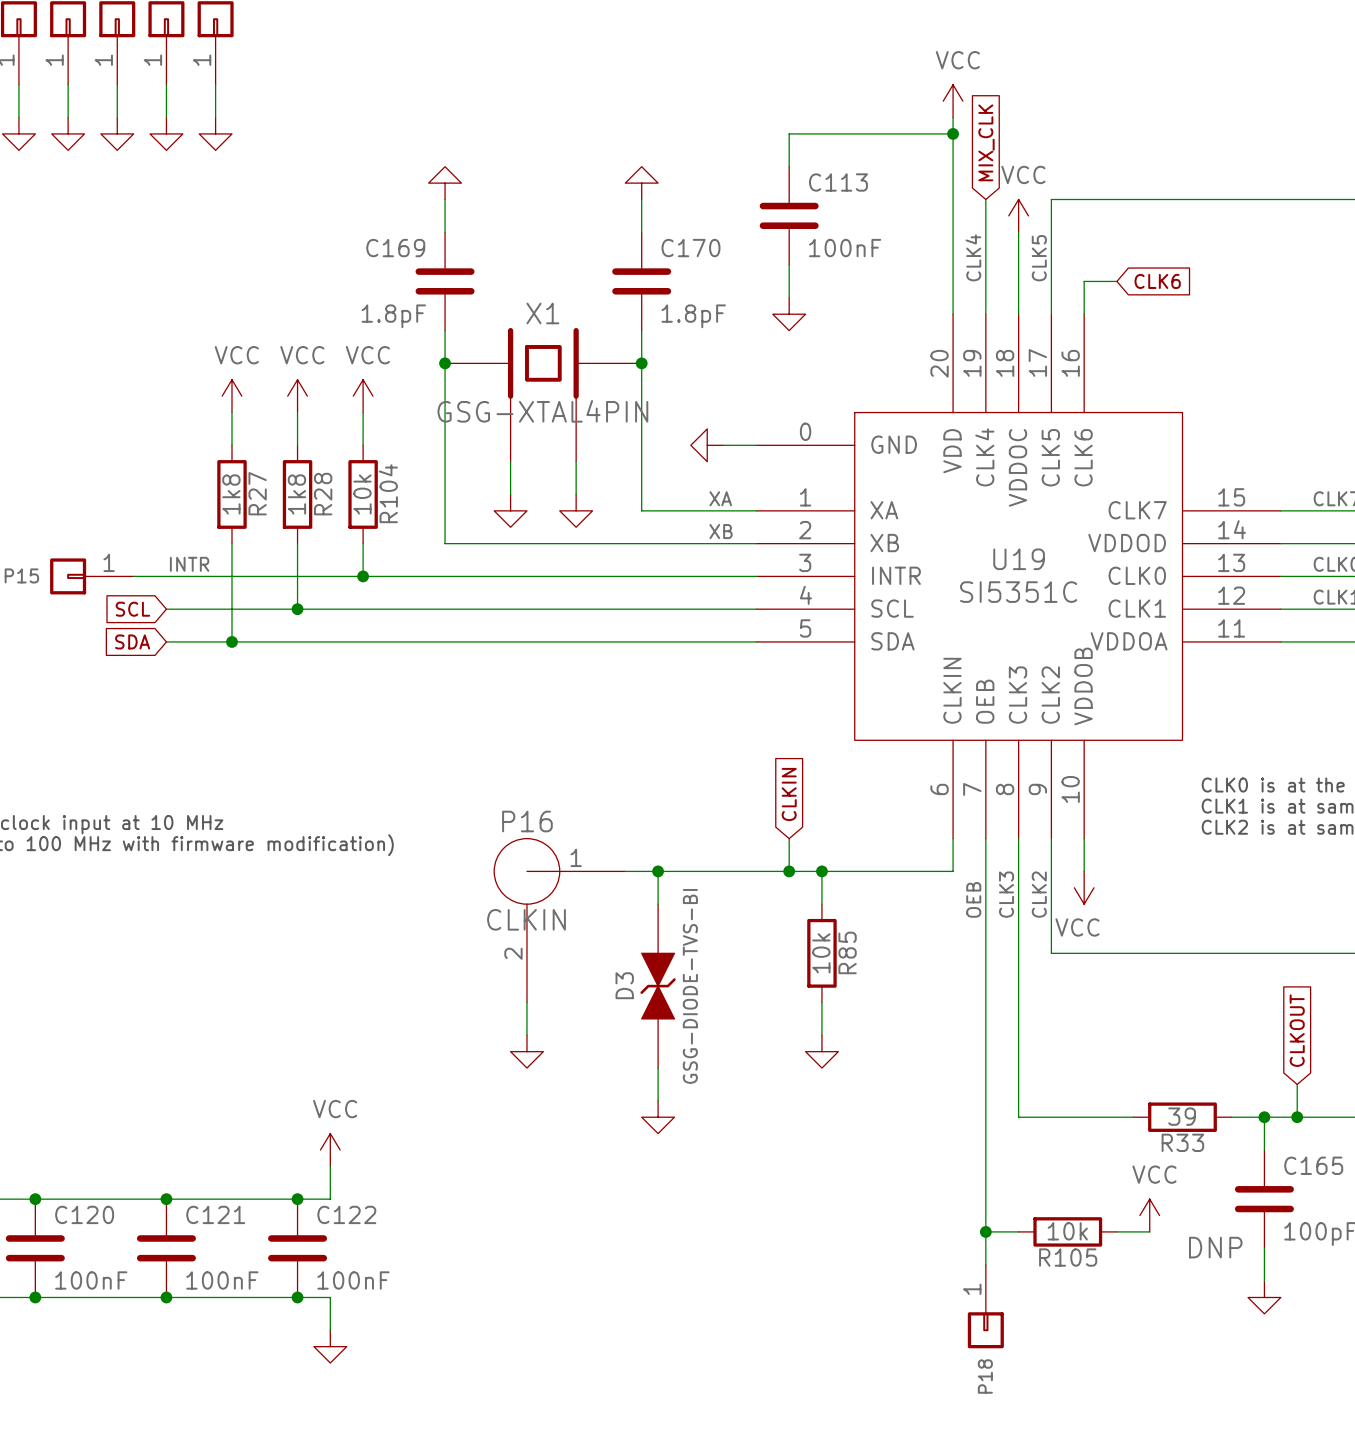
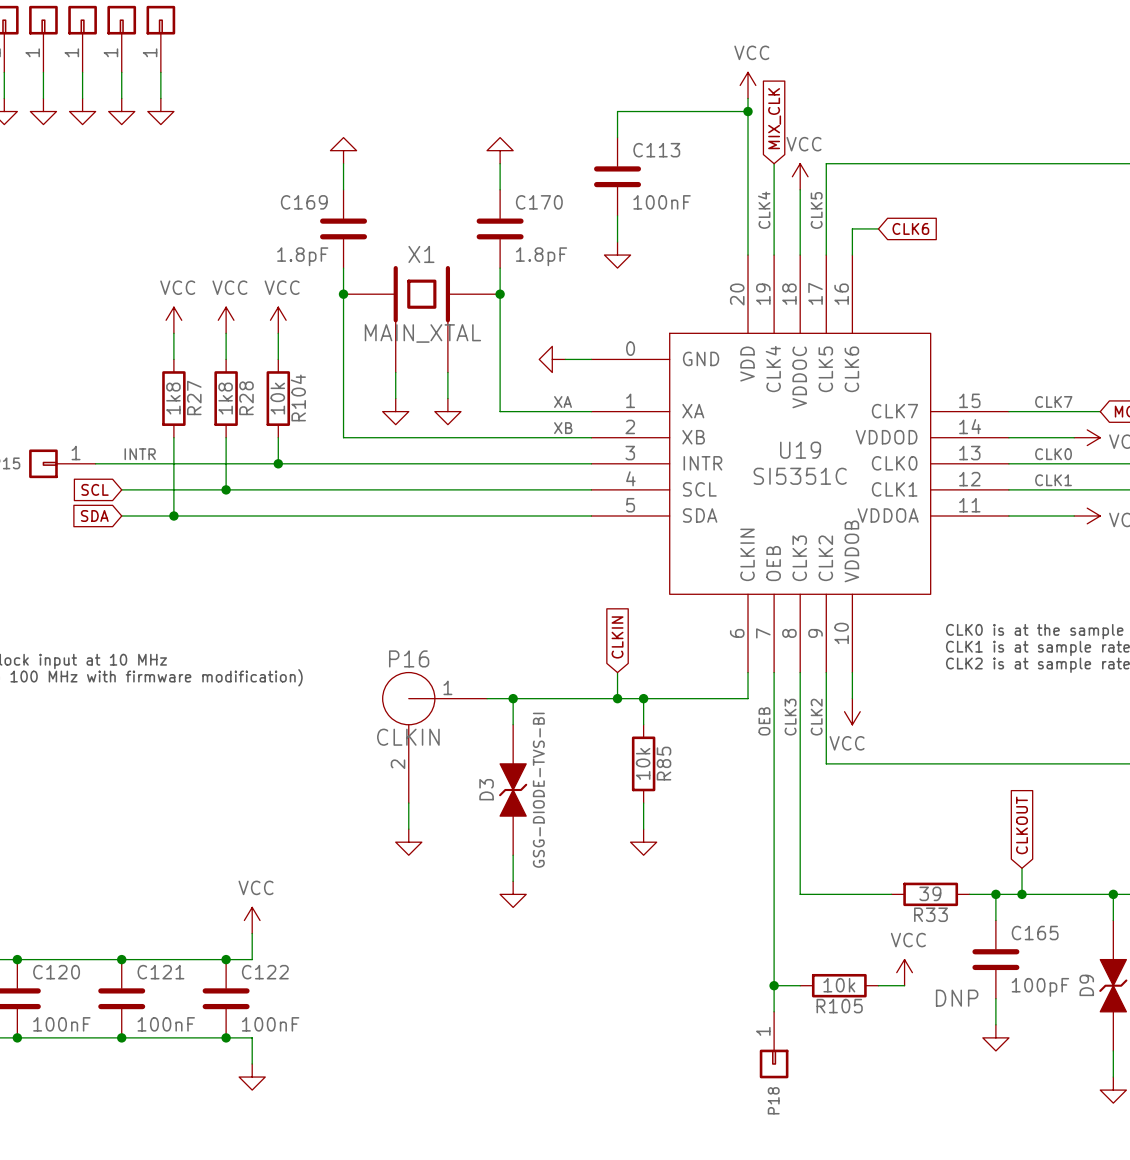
X1 value: GSG-XTAL4PIN (542, 411) -> MAIN_XTAL (422, 333)

